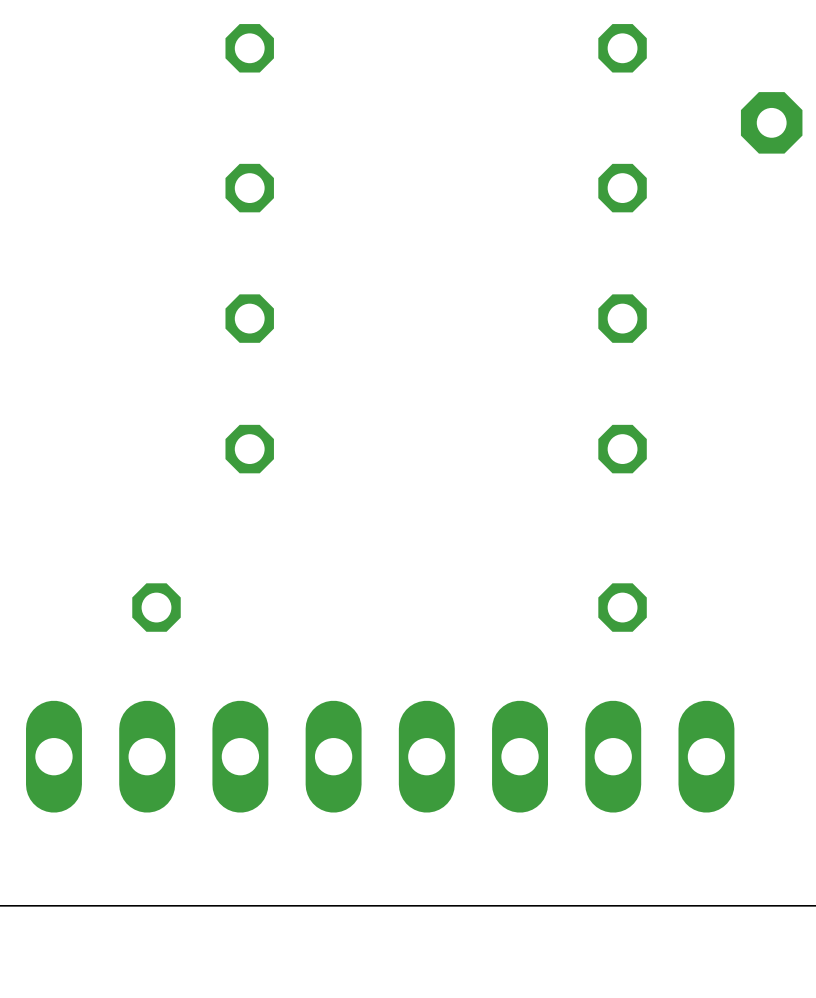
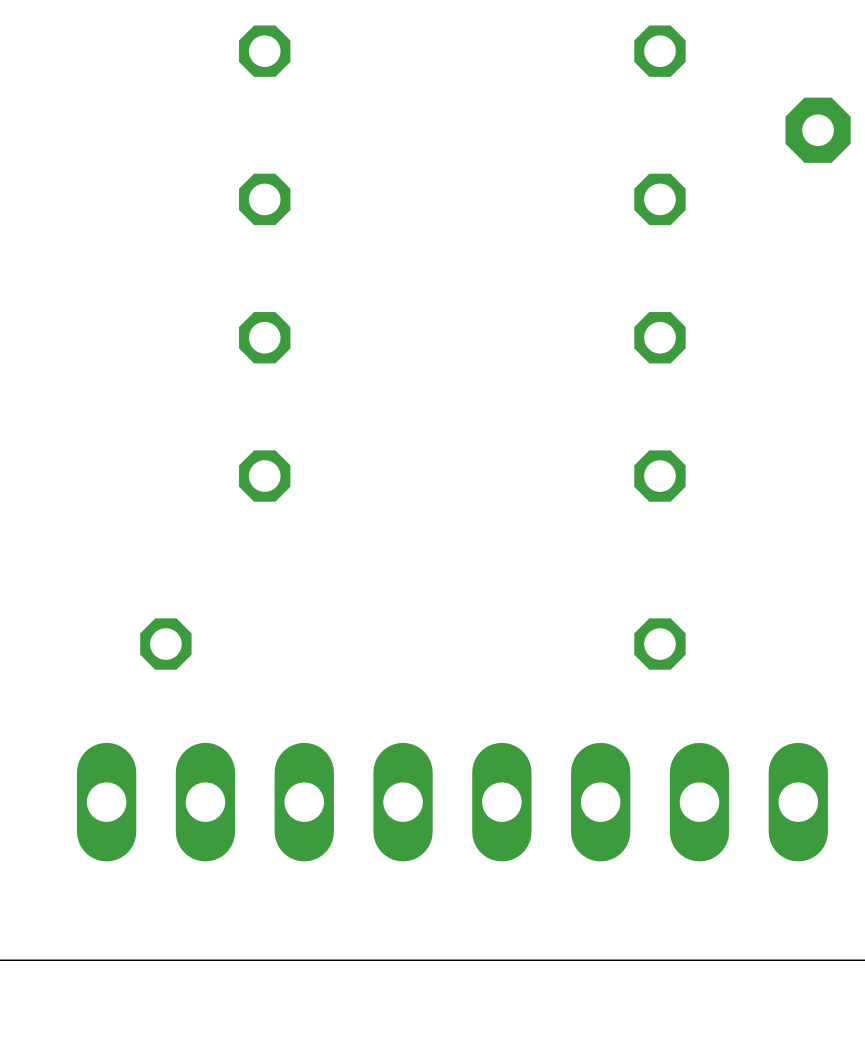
part position: (380, 756) -> (452, 802)

